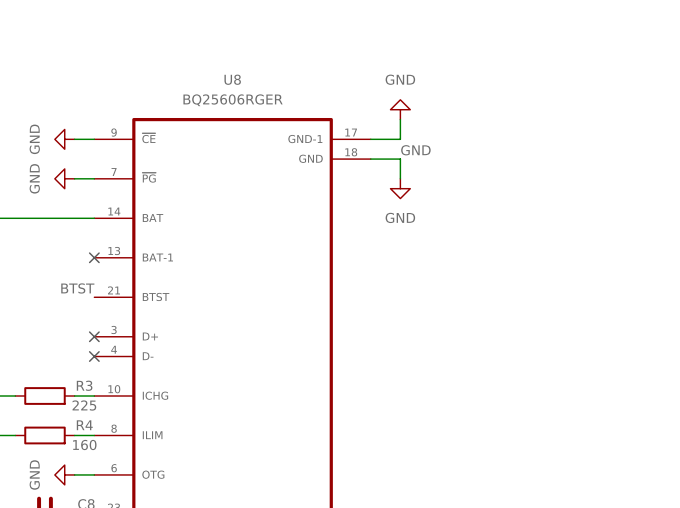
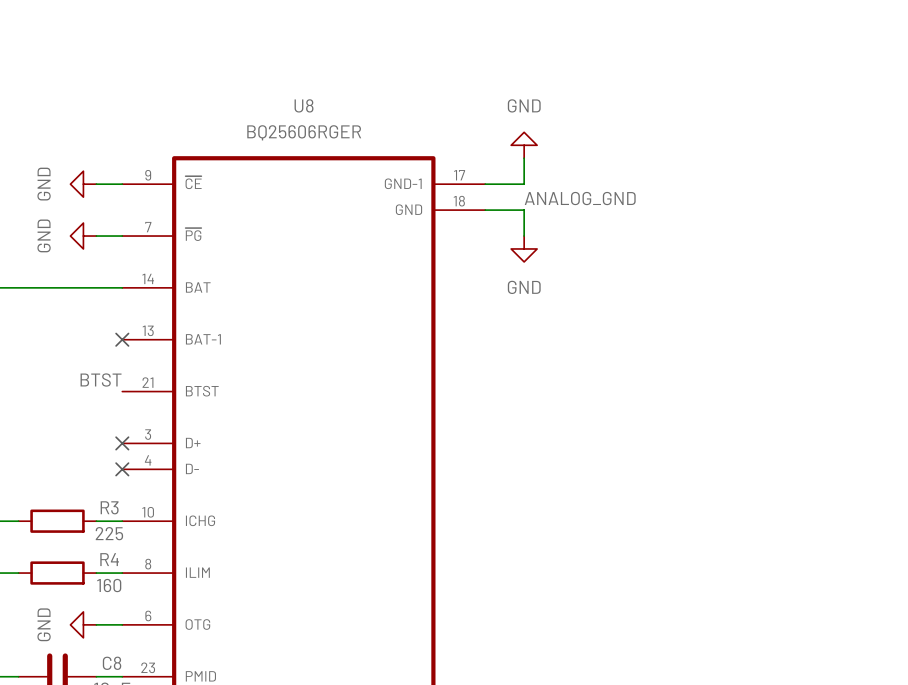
label: GND (415, 150) -> ANALOG_GND (580, 198)

